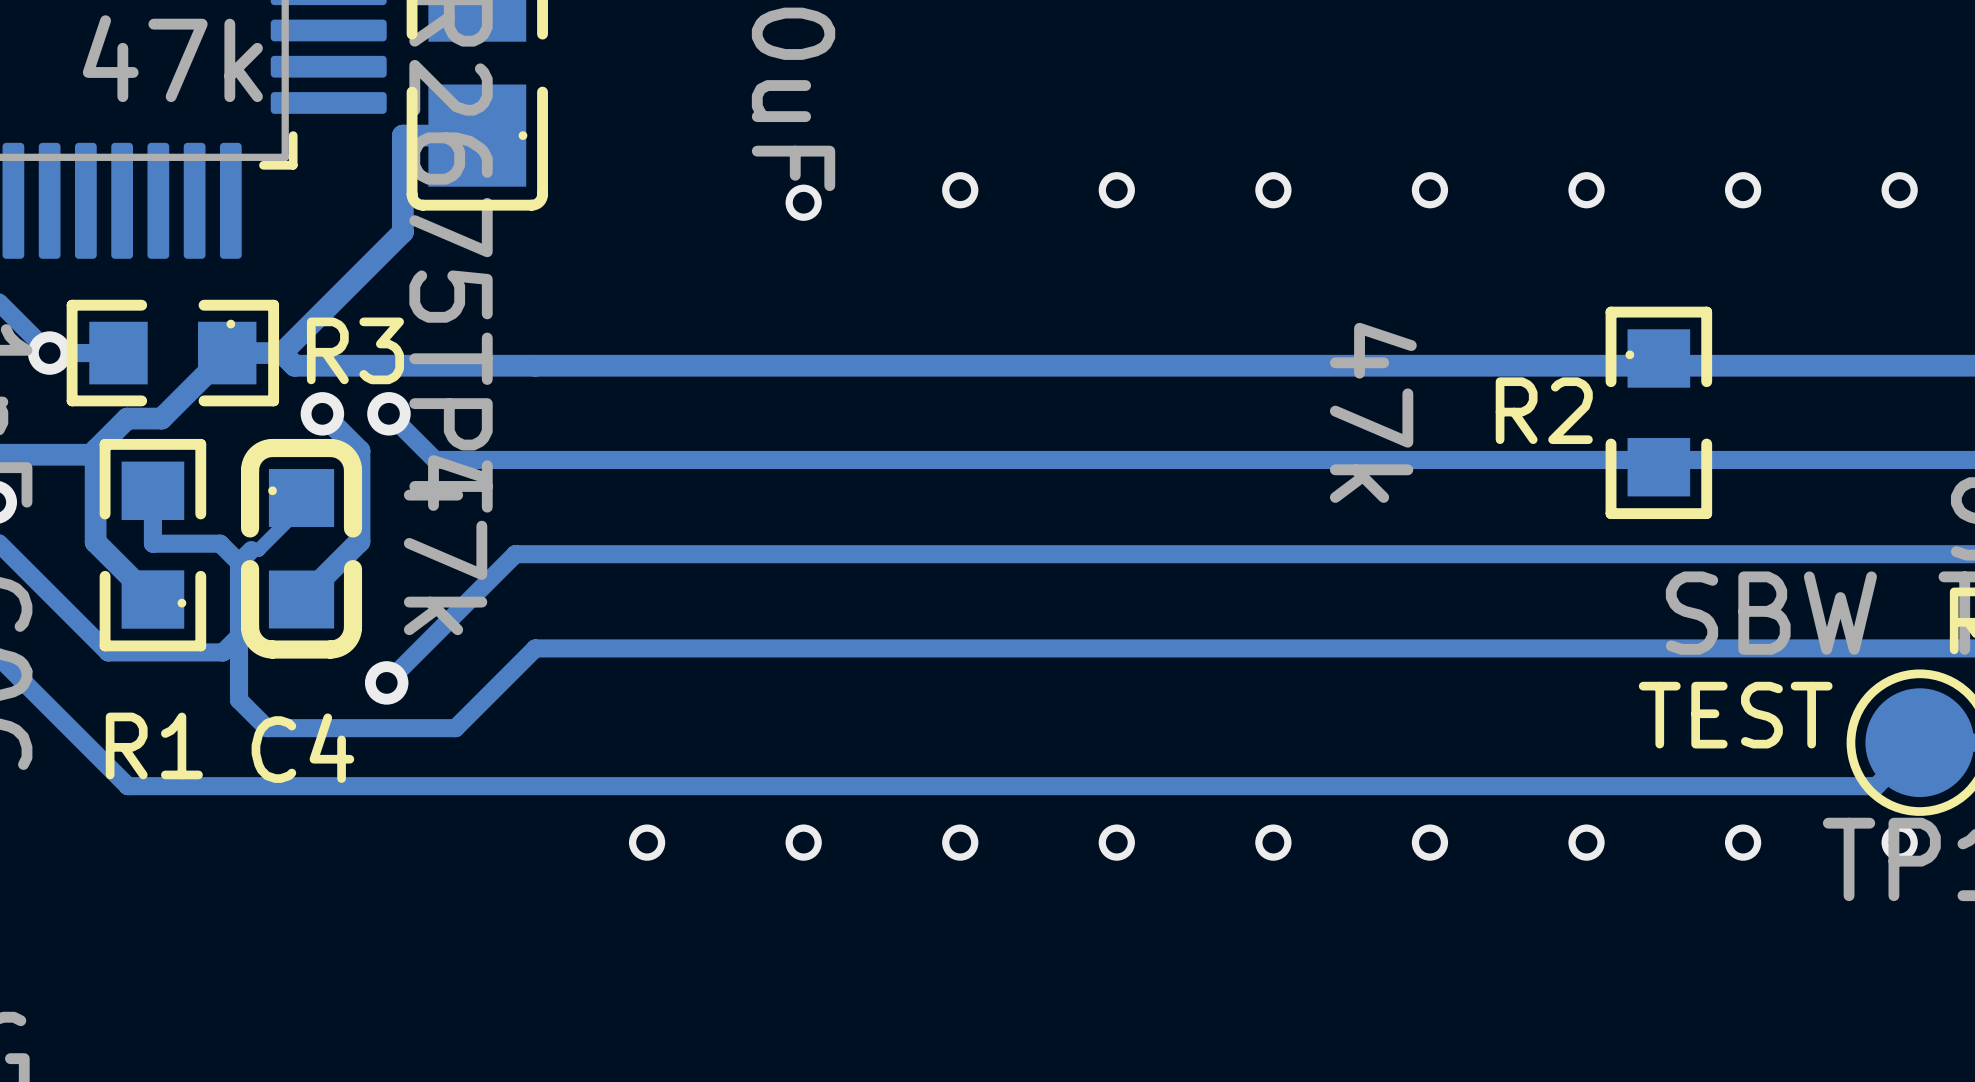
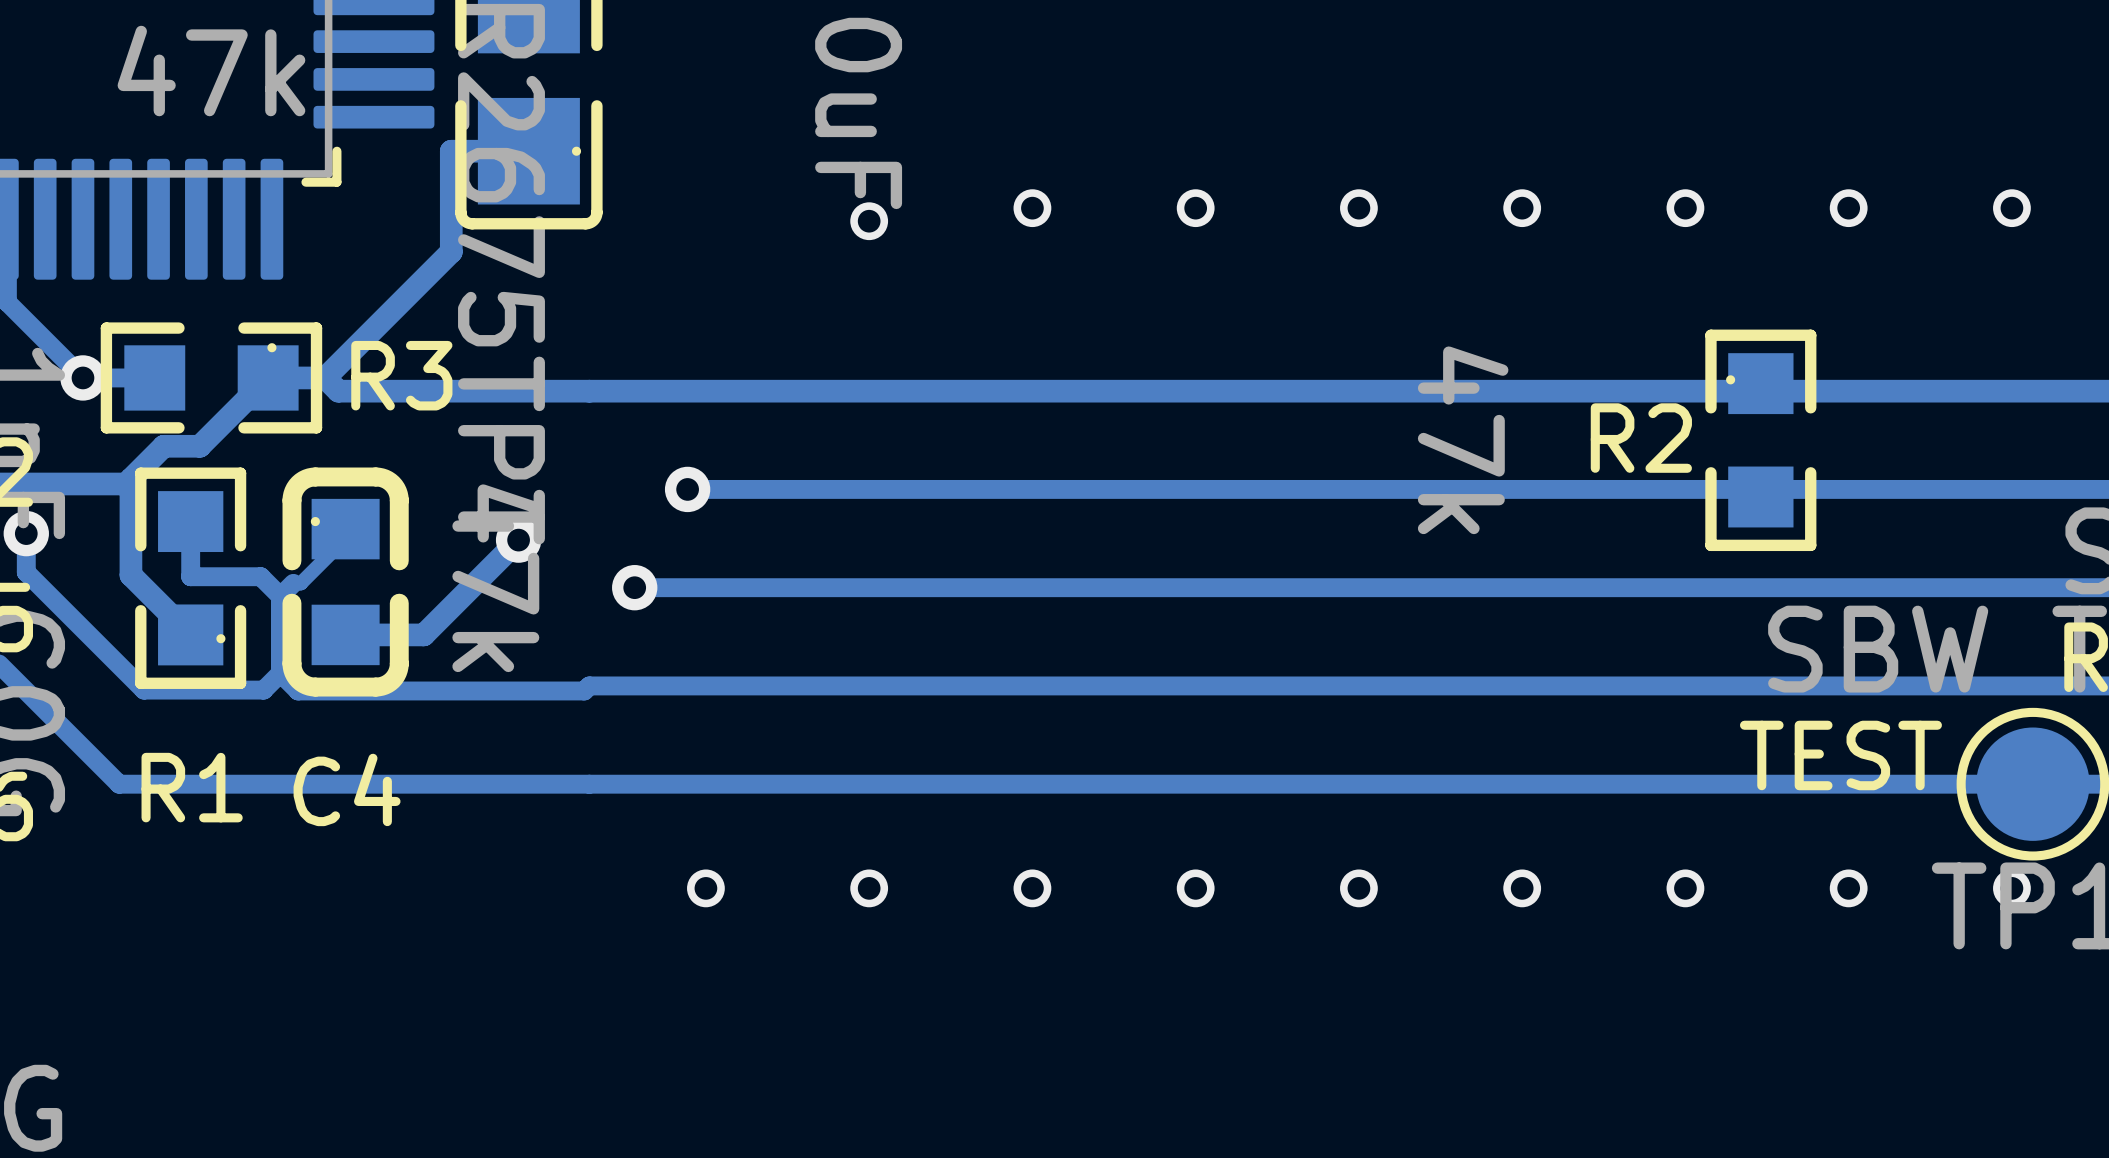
track: (322, 413) (359, 450) (359, 541) (301, 599) -> (518, 540) (423, 634) (345, 634)
via: (322, 413) -> none
track: (388, 413) (435, 459) (629, 459) -> none
via: (388, 413) -> none
via: none -> (687, 489)
via: none -> (518, 540)
track: (578, 554) (515, 554) (386, 682) -> none
via: none -> (634, 587)
track: (239, 636) (239, 700) (267, 728) (455, 728) (530, 653) -> (280, 673) (298, 690) (584, 690)
via: (386, 682) -> none
track: (1919, 742) (1876, 786) (127, 786) (84, 742) -> (2032, 784) (119, 784)

